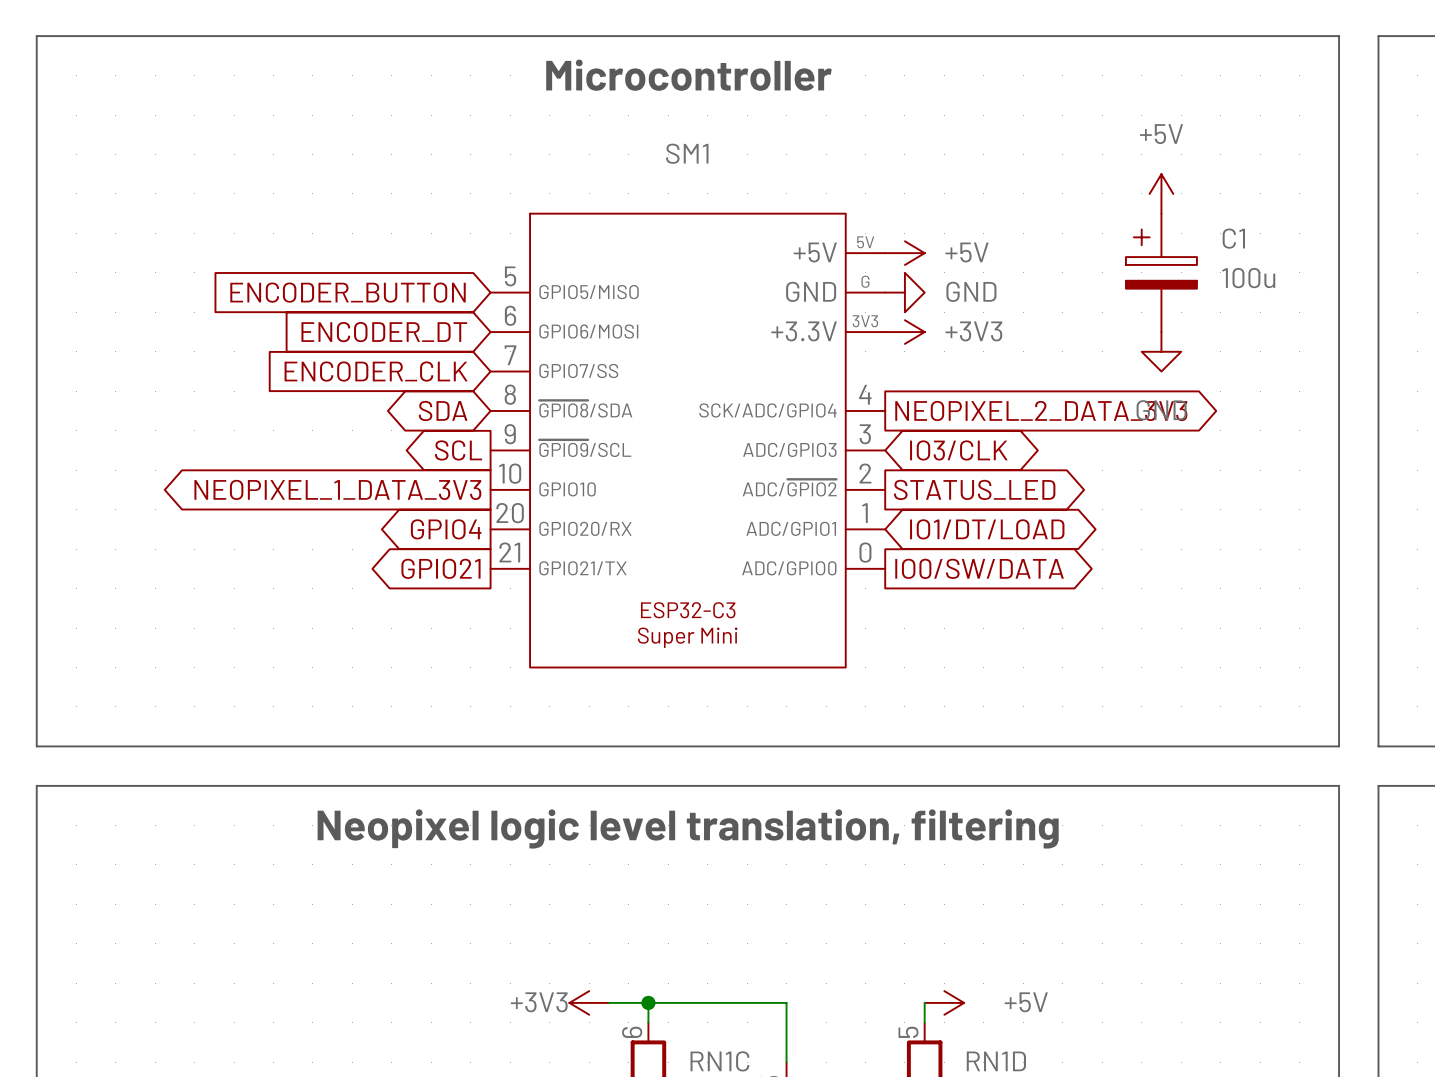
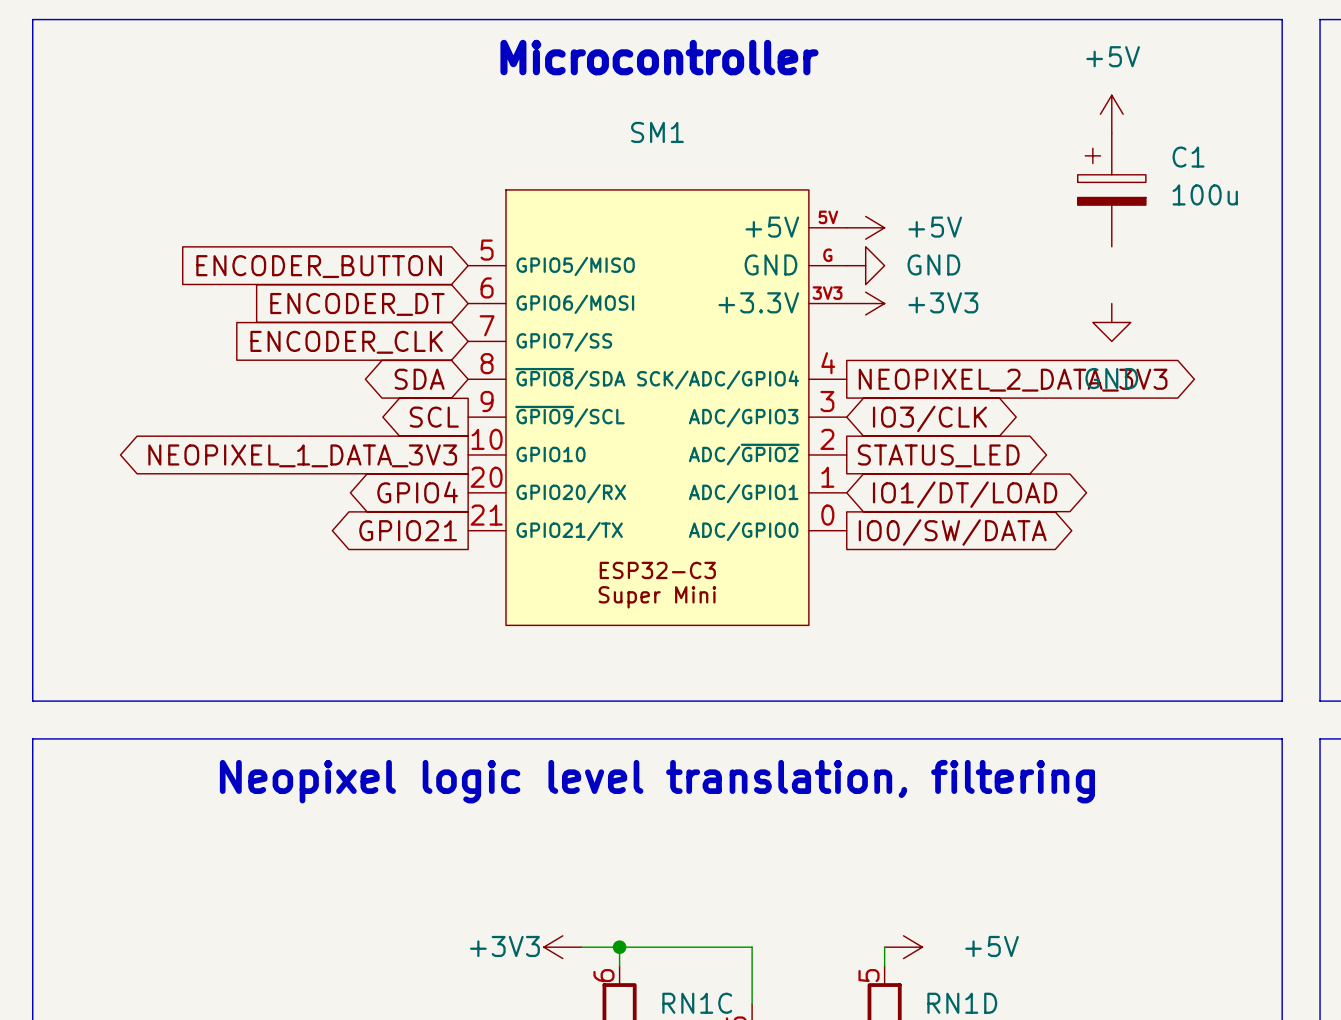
power symbol position: +5V (1161, 193) -> +5V (1111, 114)
C1 position: (1161, 272) -> (1111, 189)

